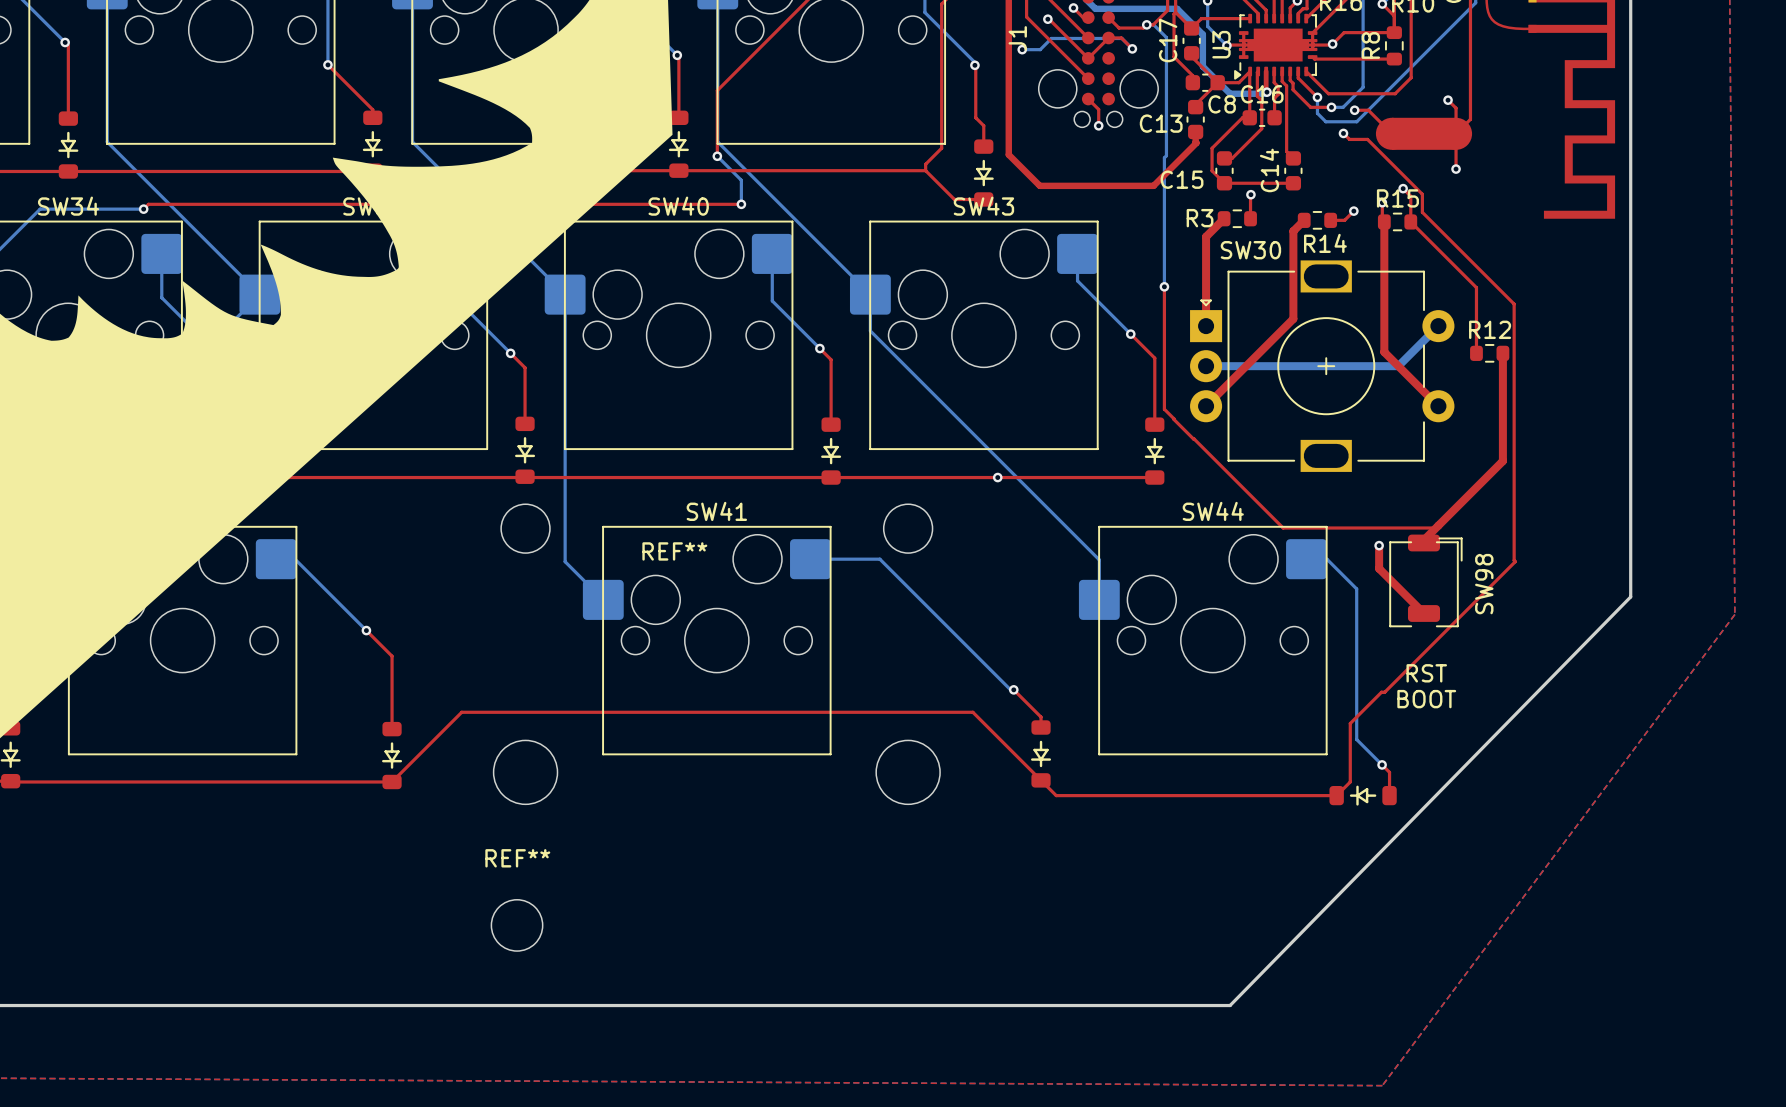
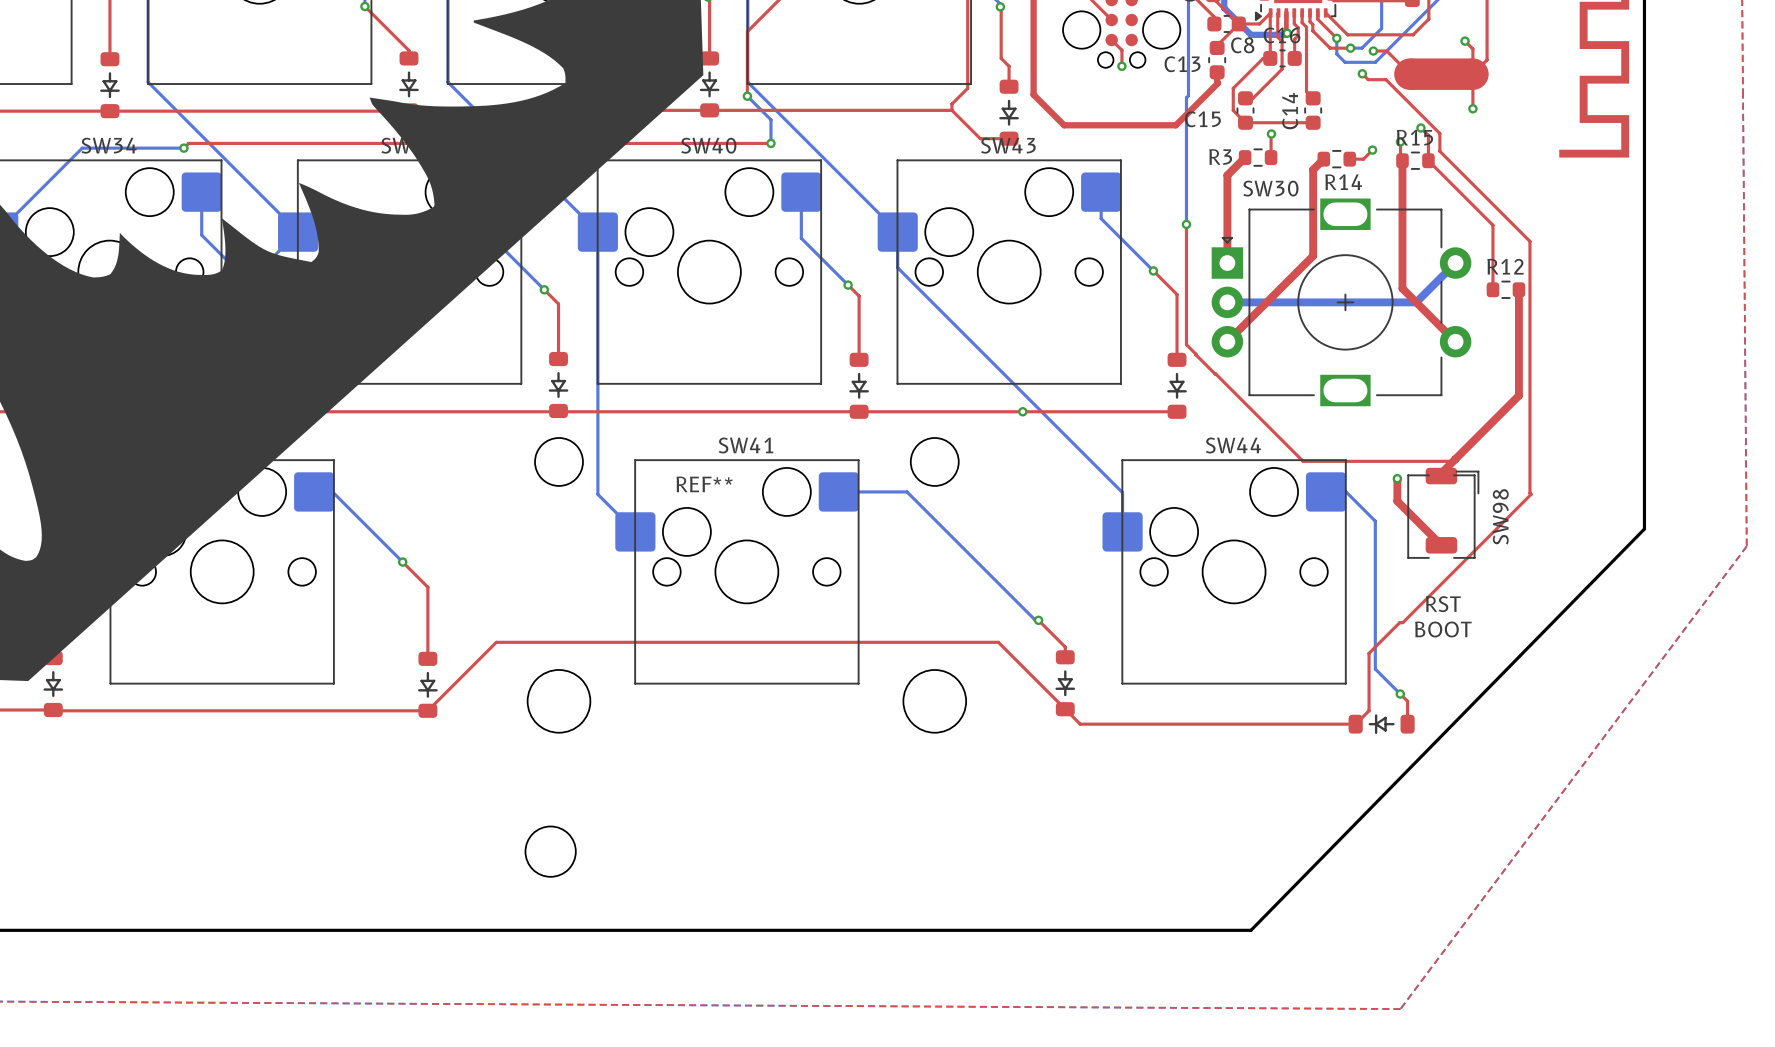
REF** name: REF** (517, 858) -> none

